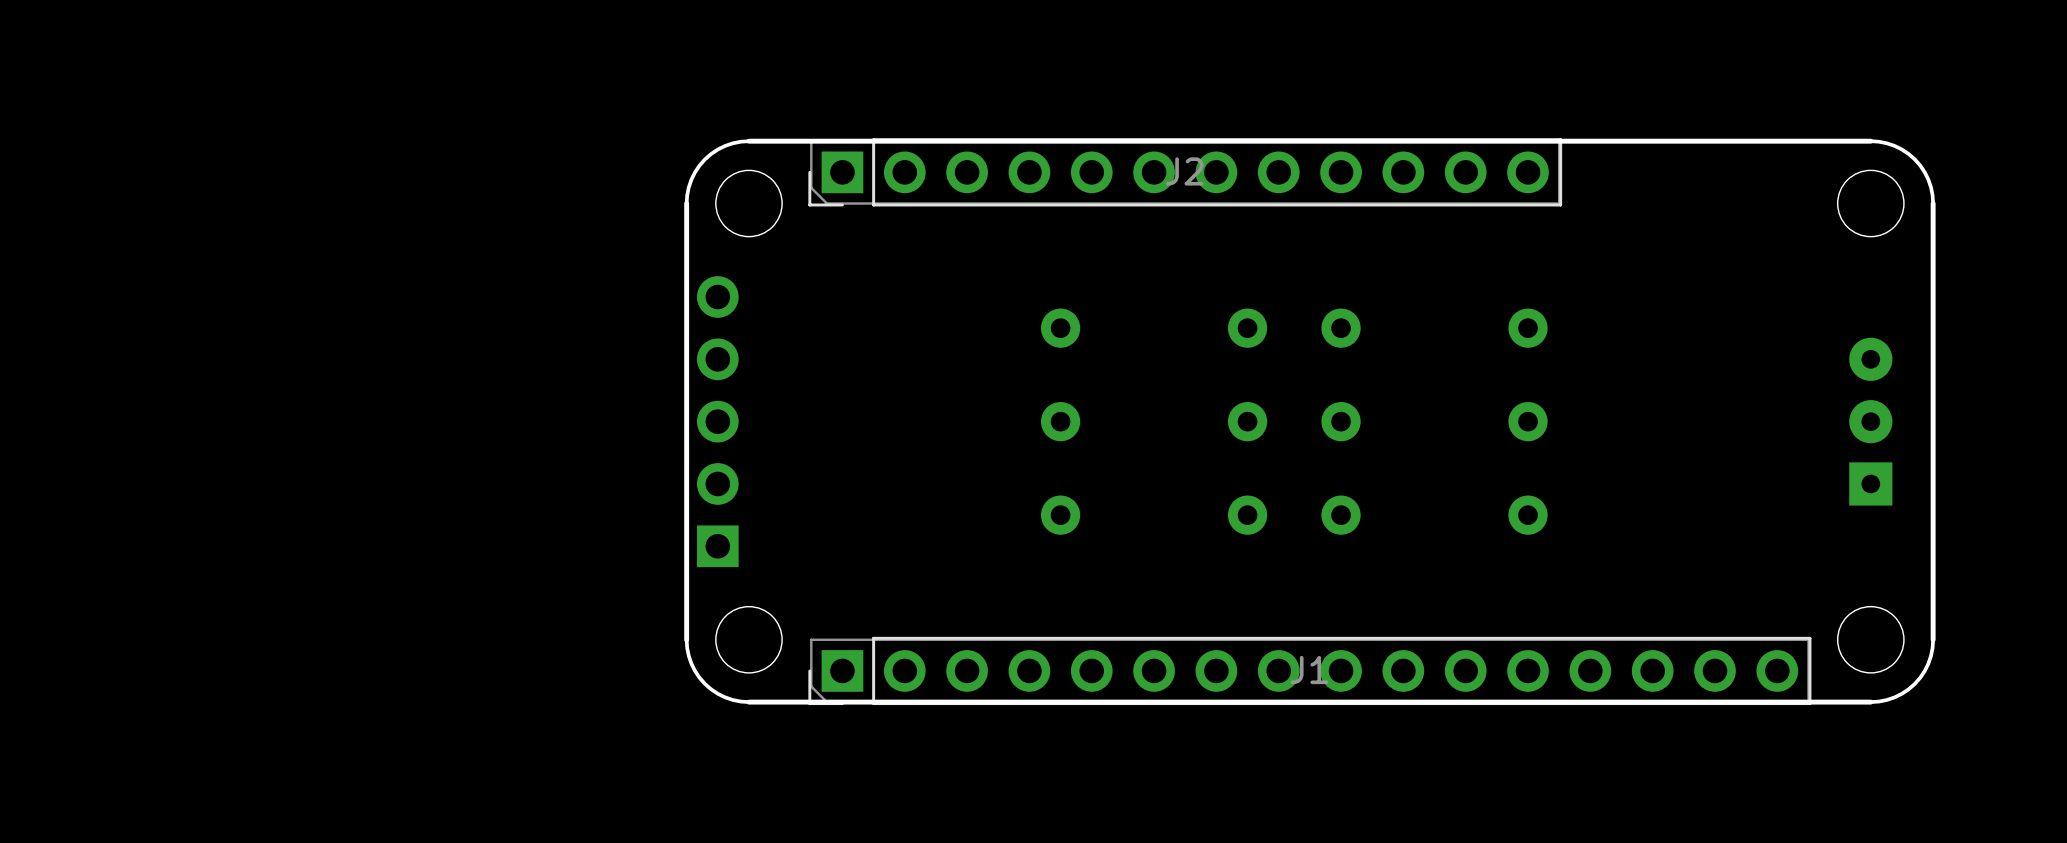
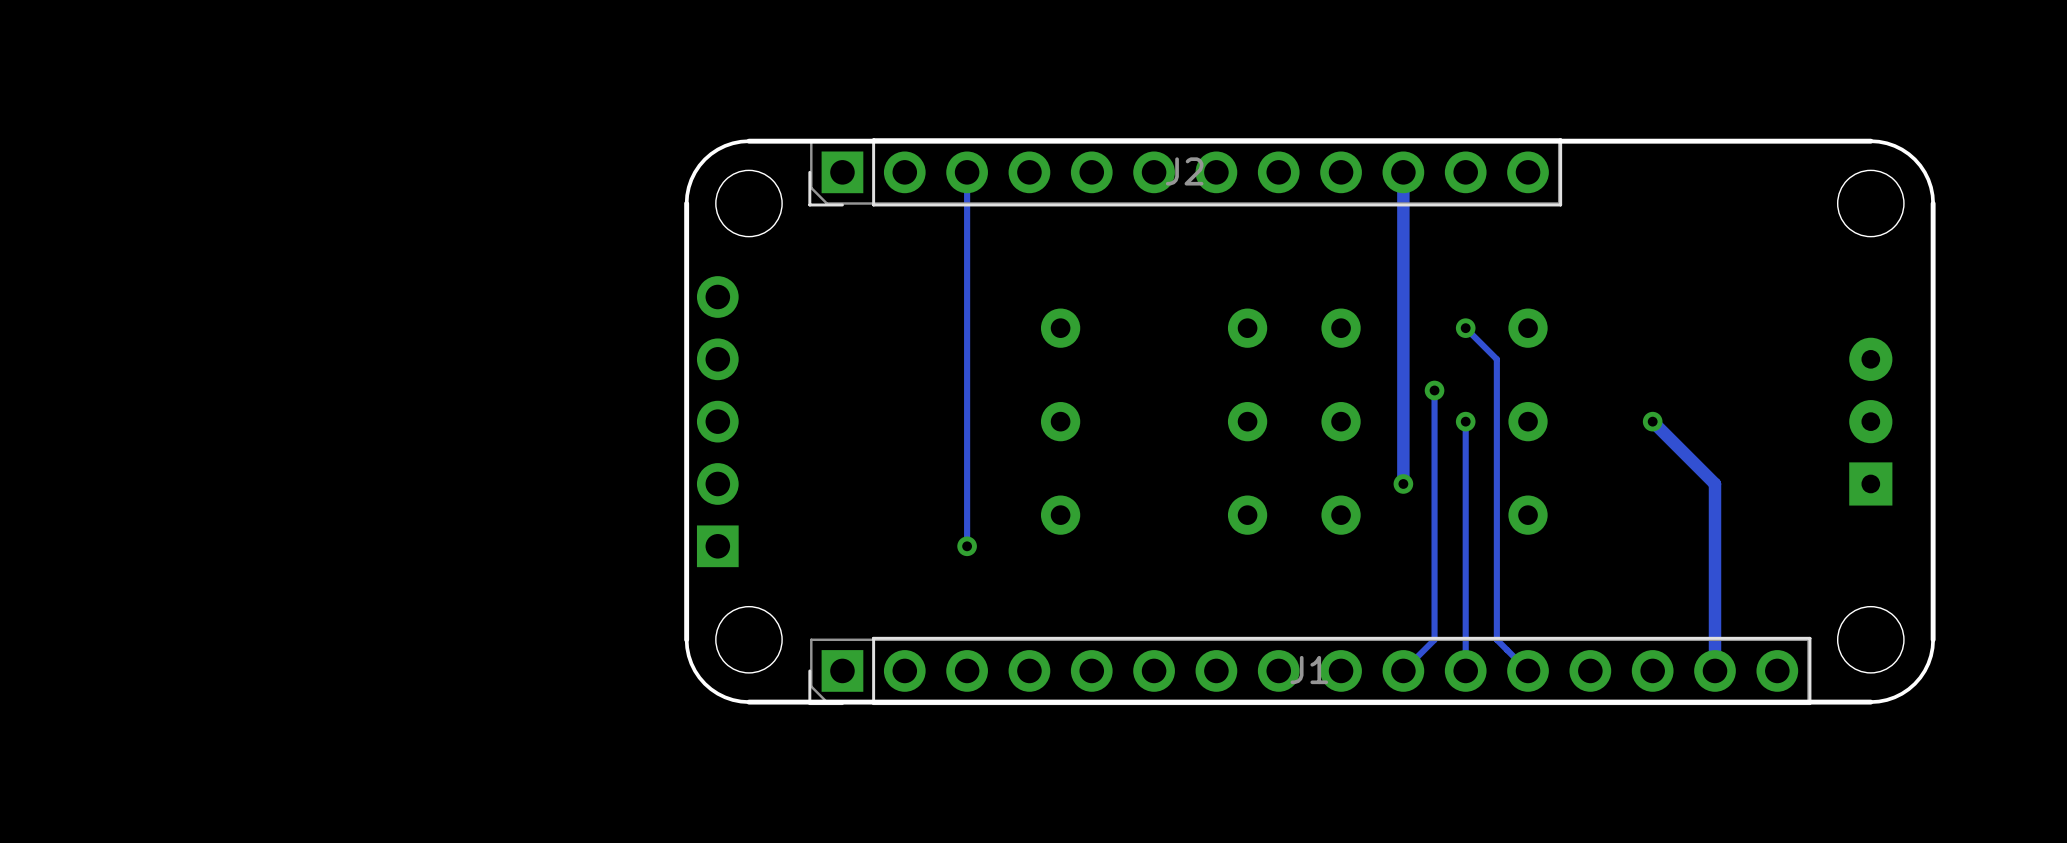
track: none -> (967, 172) (967, 546)
track: none -> (1403, 172) (1403, 483)
track: none -> (1465, 328) (1496, 359) (1496, 639) (1528, 670)
via: none -> (1465, 328)
track: none -> (1434, 390) (1434, 639) (1403, 670)
via: none -> (1434, 390)
track: none -> (1465, 421) (1465, 670)
via: none -> (1465, 421)
track: none -> (1652, 421) (1715, 483) (1715, 670)
via: none -> (1652, 421)
via: none -> (1403, 483)
via: none -> (967, 546)

